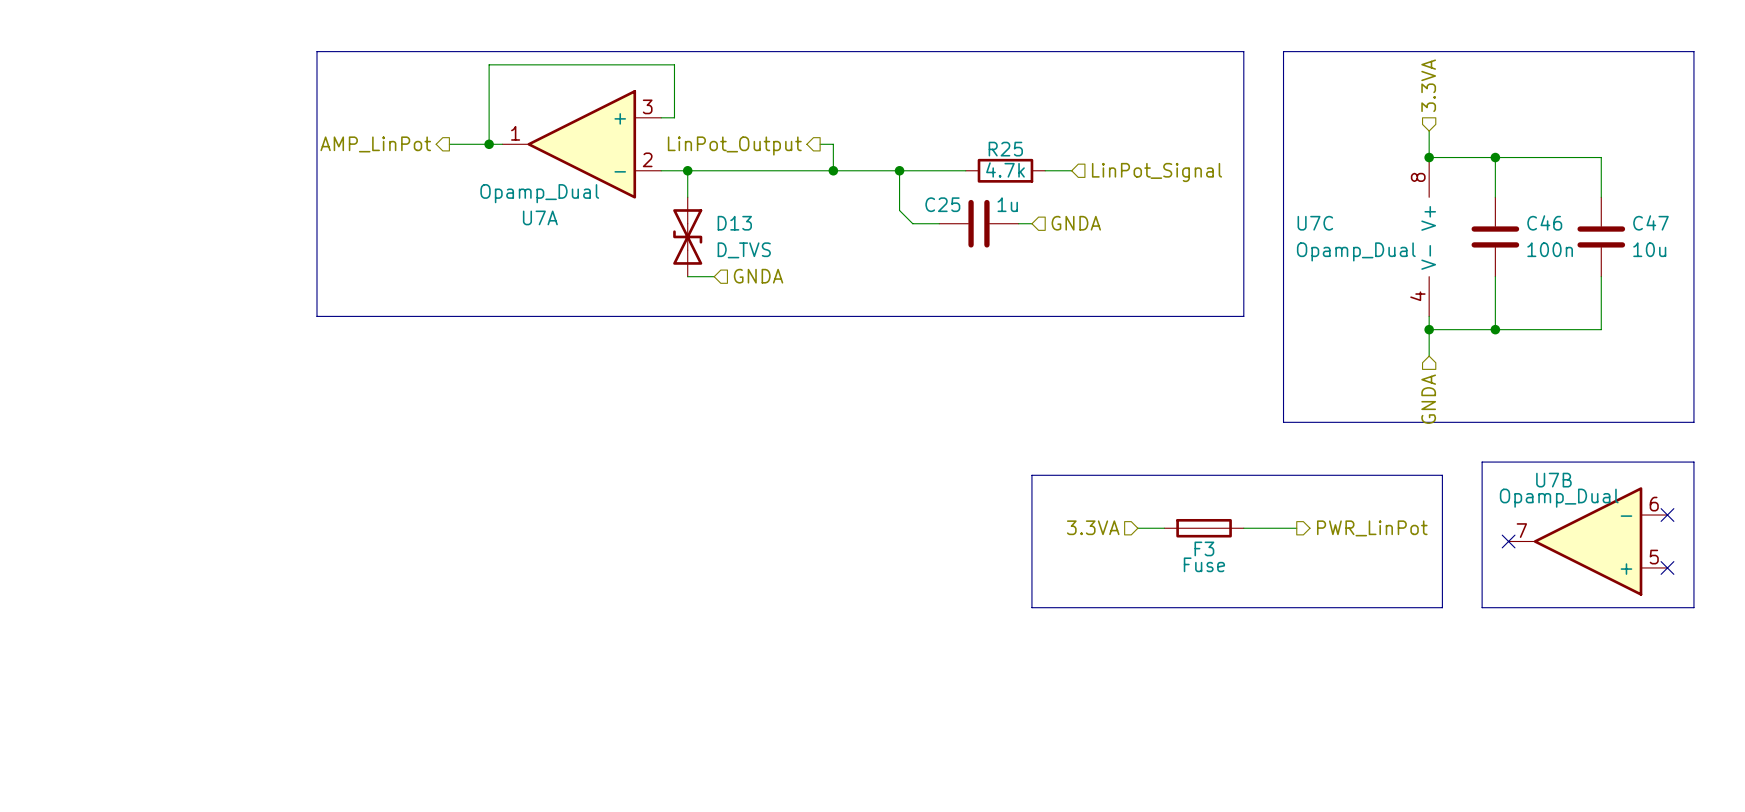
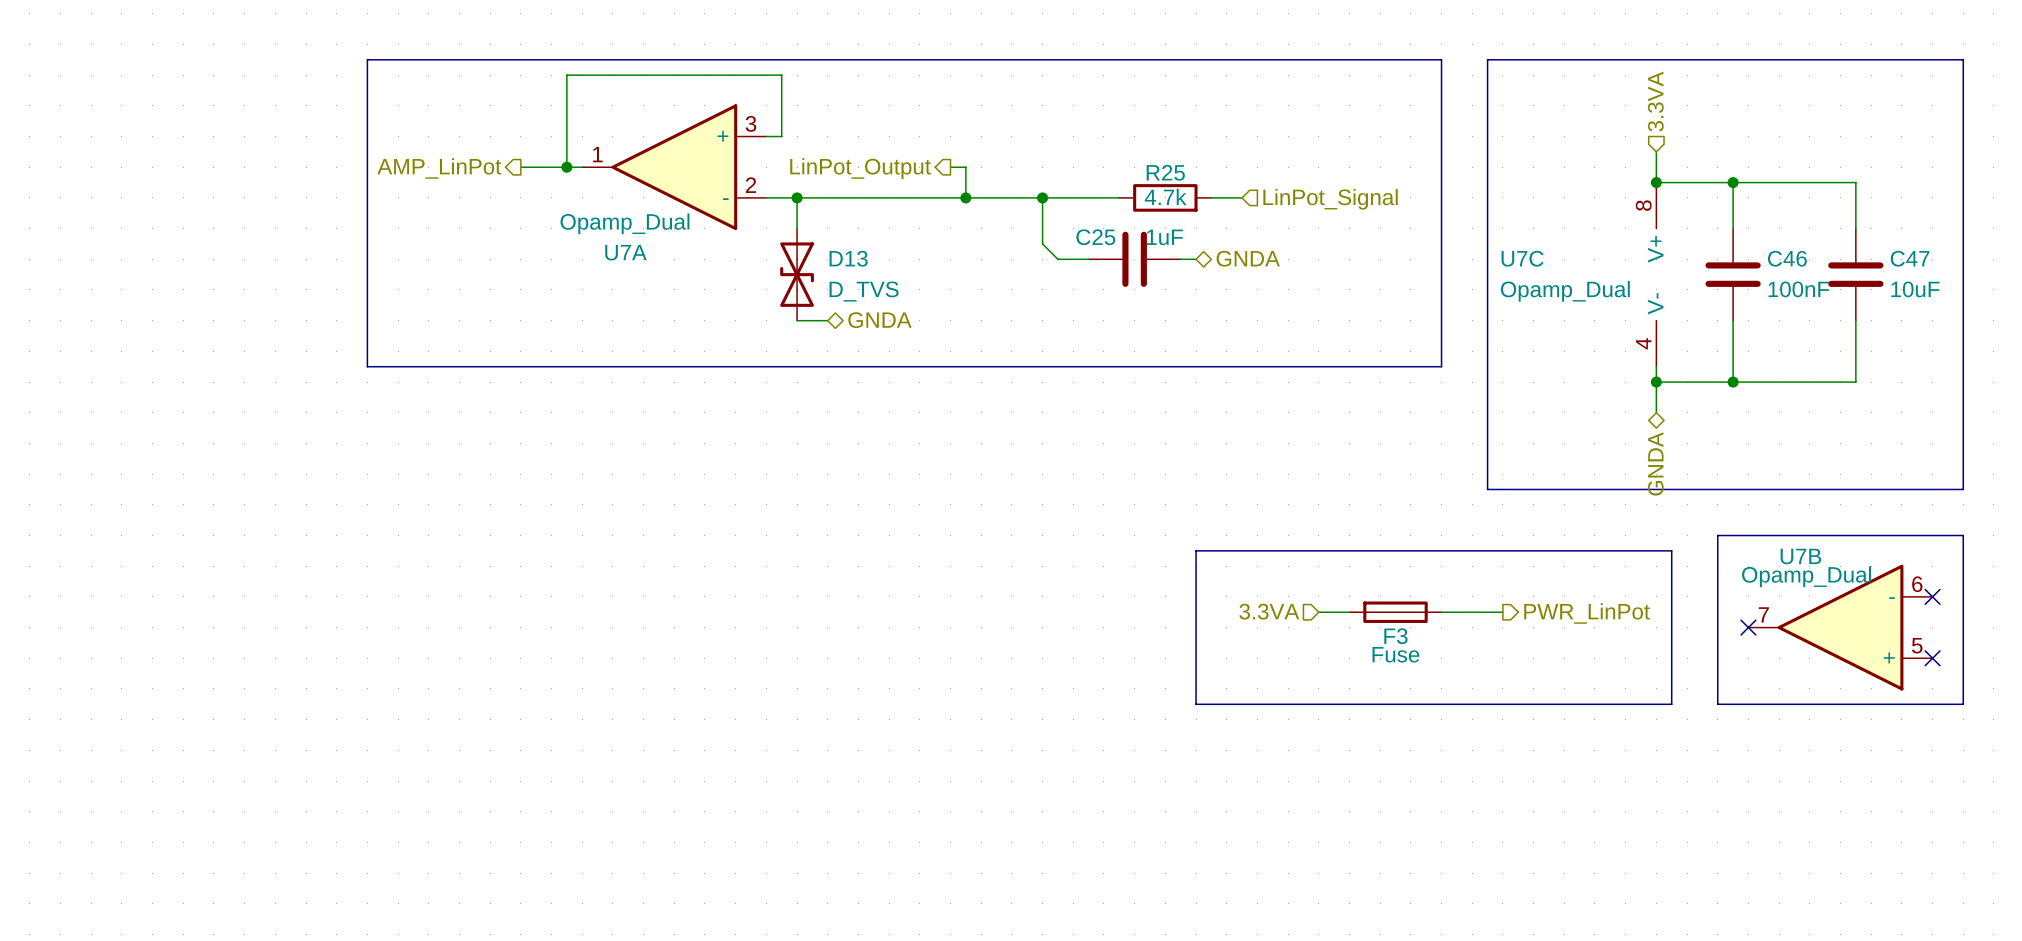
C25 value: 1u (1007, 204) -> 1uF (1164, 237)
hierarchical label shape: input (1076, 223) -> bidirectional (1248, 258)
C46 value: 100n (1550, 249) -> 100nF (1798, 289)
C47 value: 10u (1649, 249) -> 10uF (1915, 289)
hierarchical label shape: input (758, 276) -> bidirectional (879, 320)
hierarchical label shape: input (1428, 399) -> bidirectional (1655, 463)

